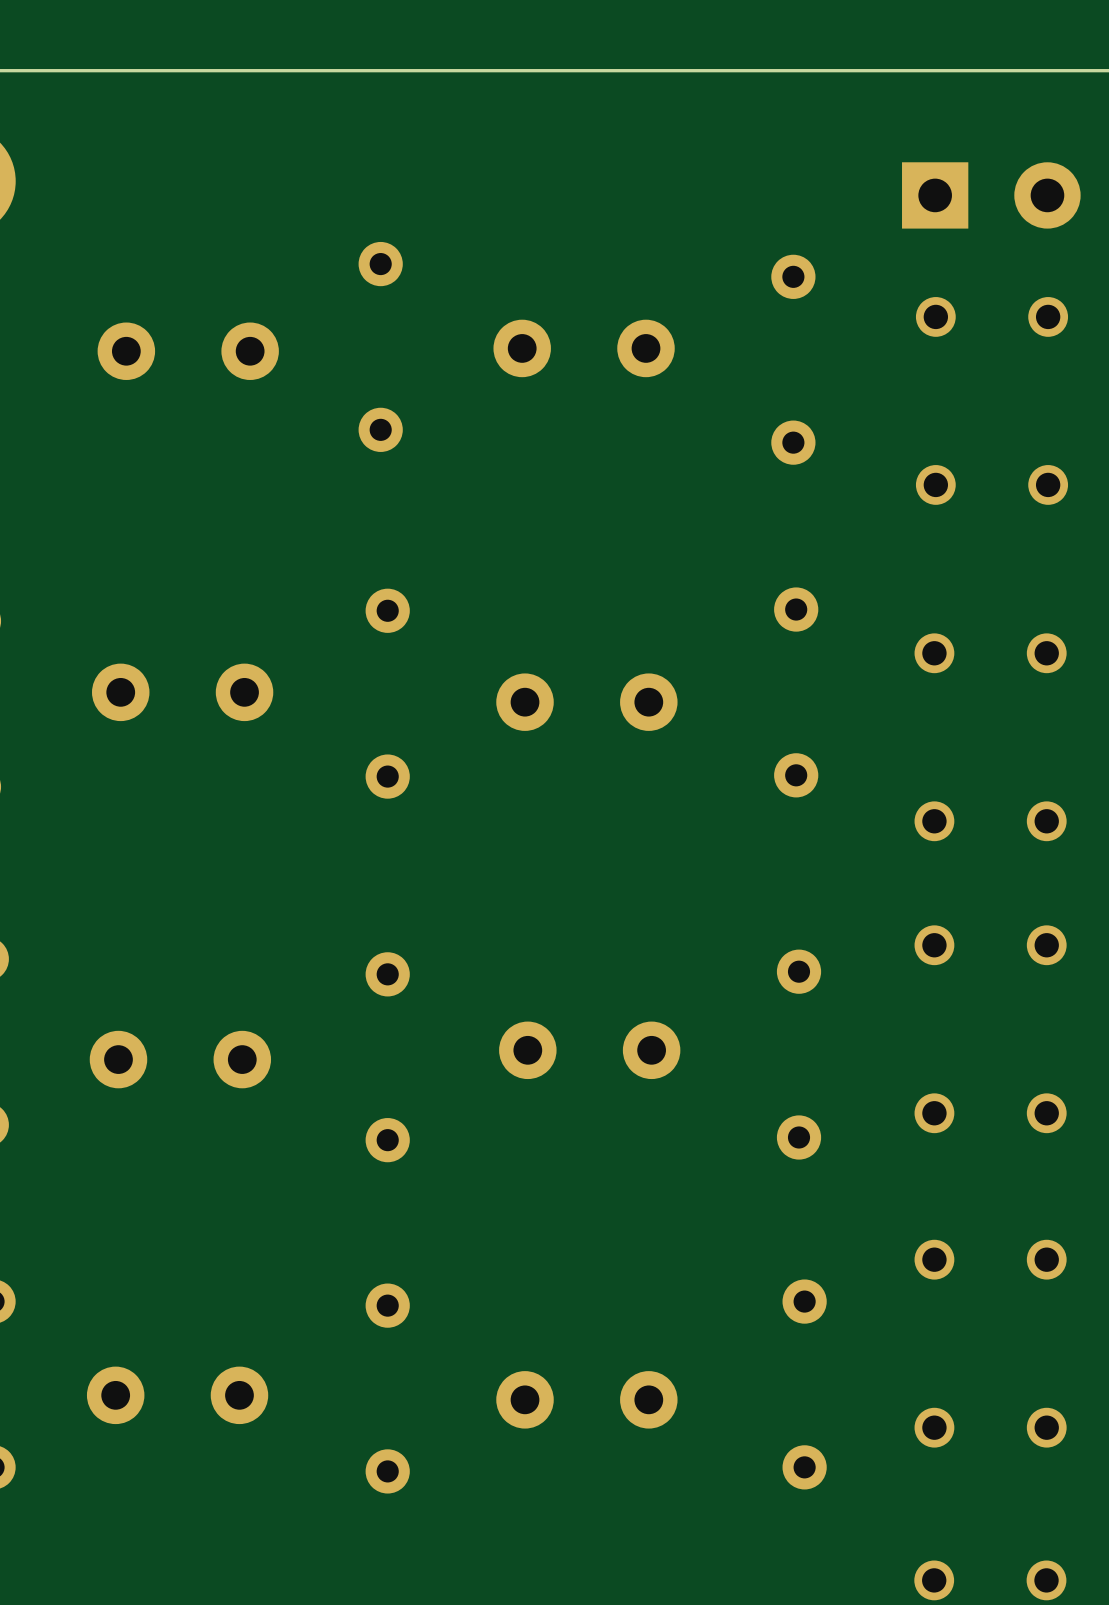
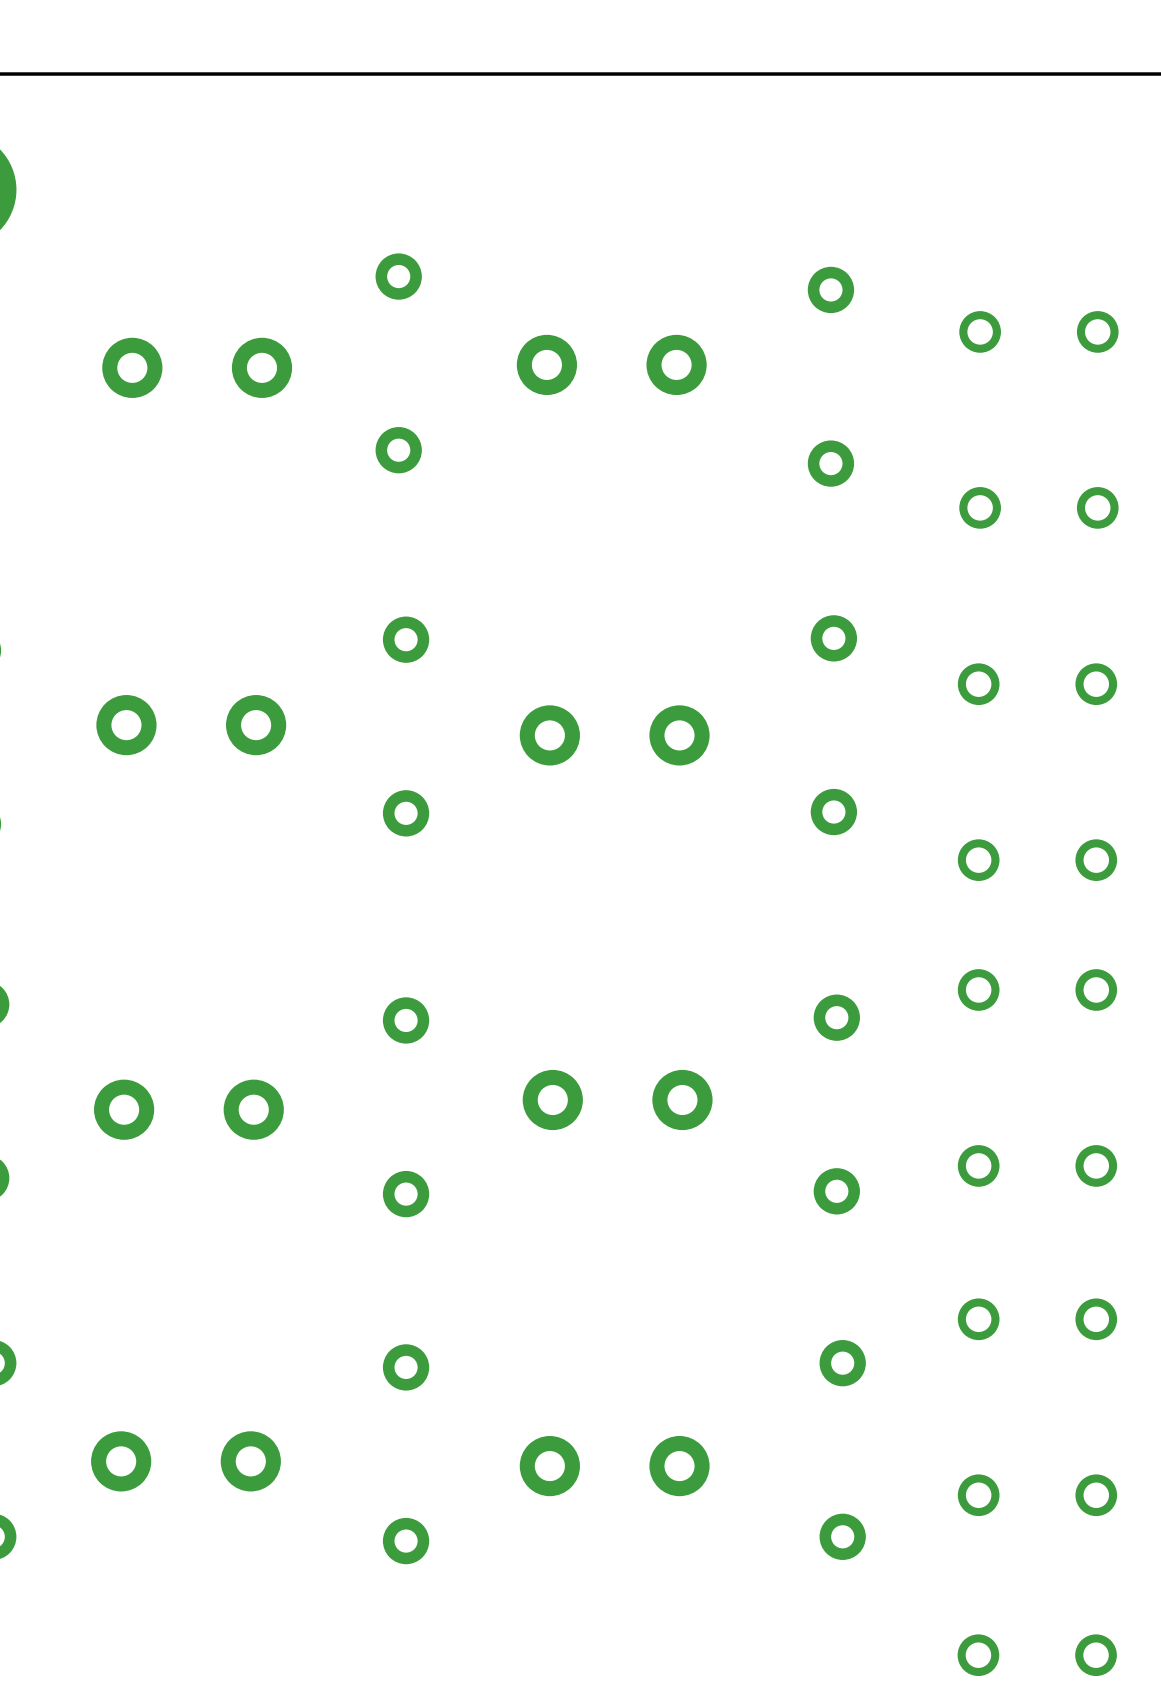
part: (991, 195) -> none

